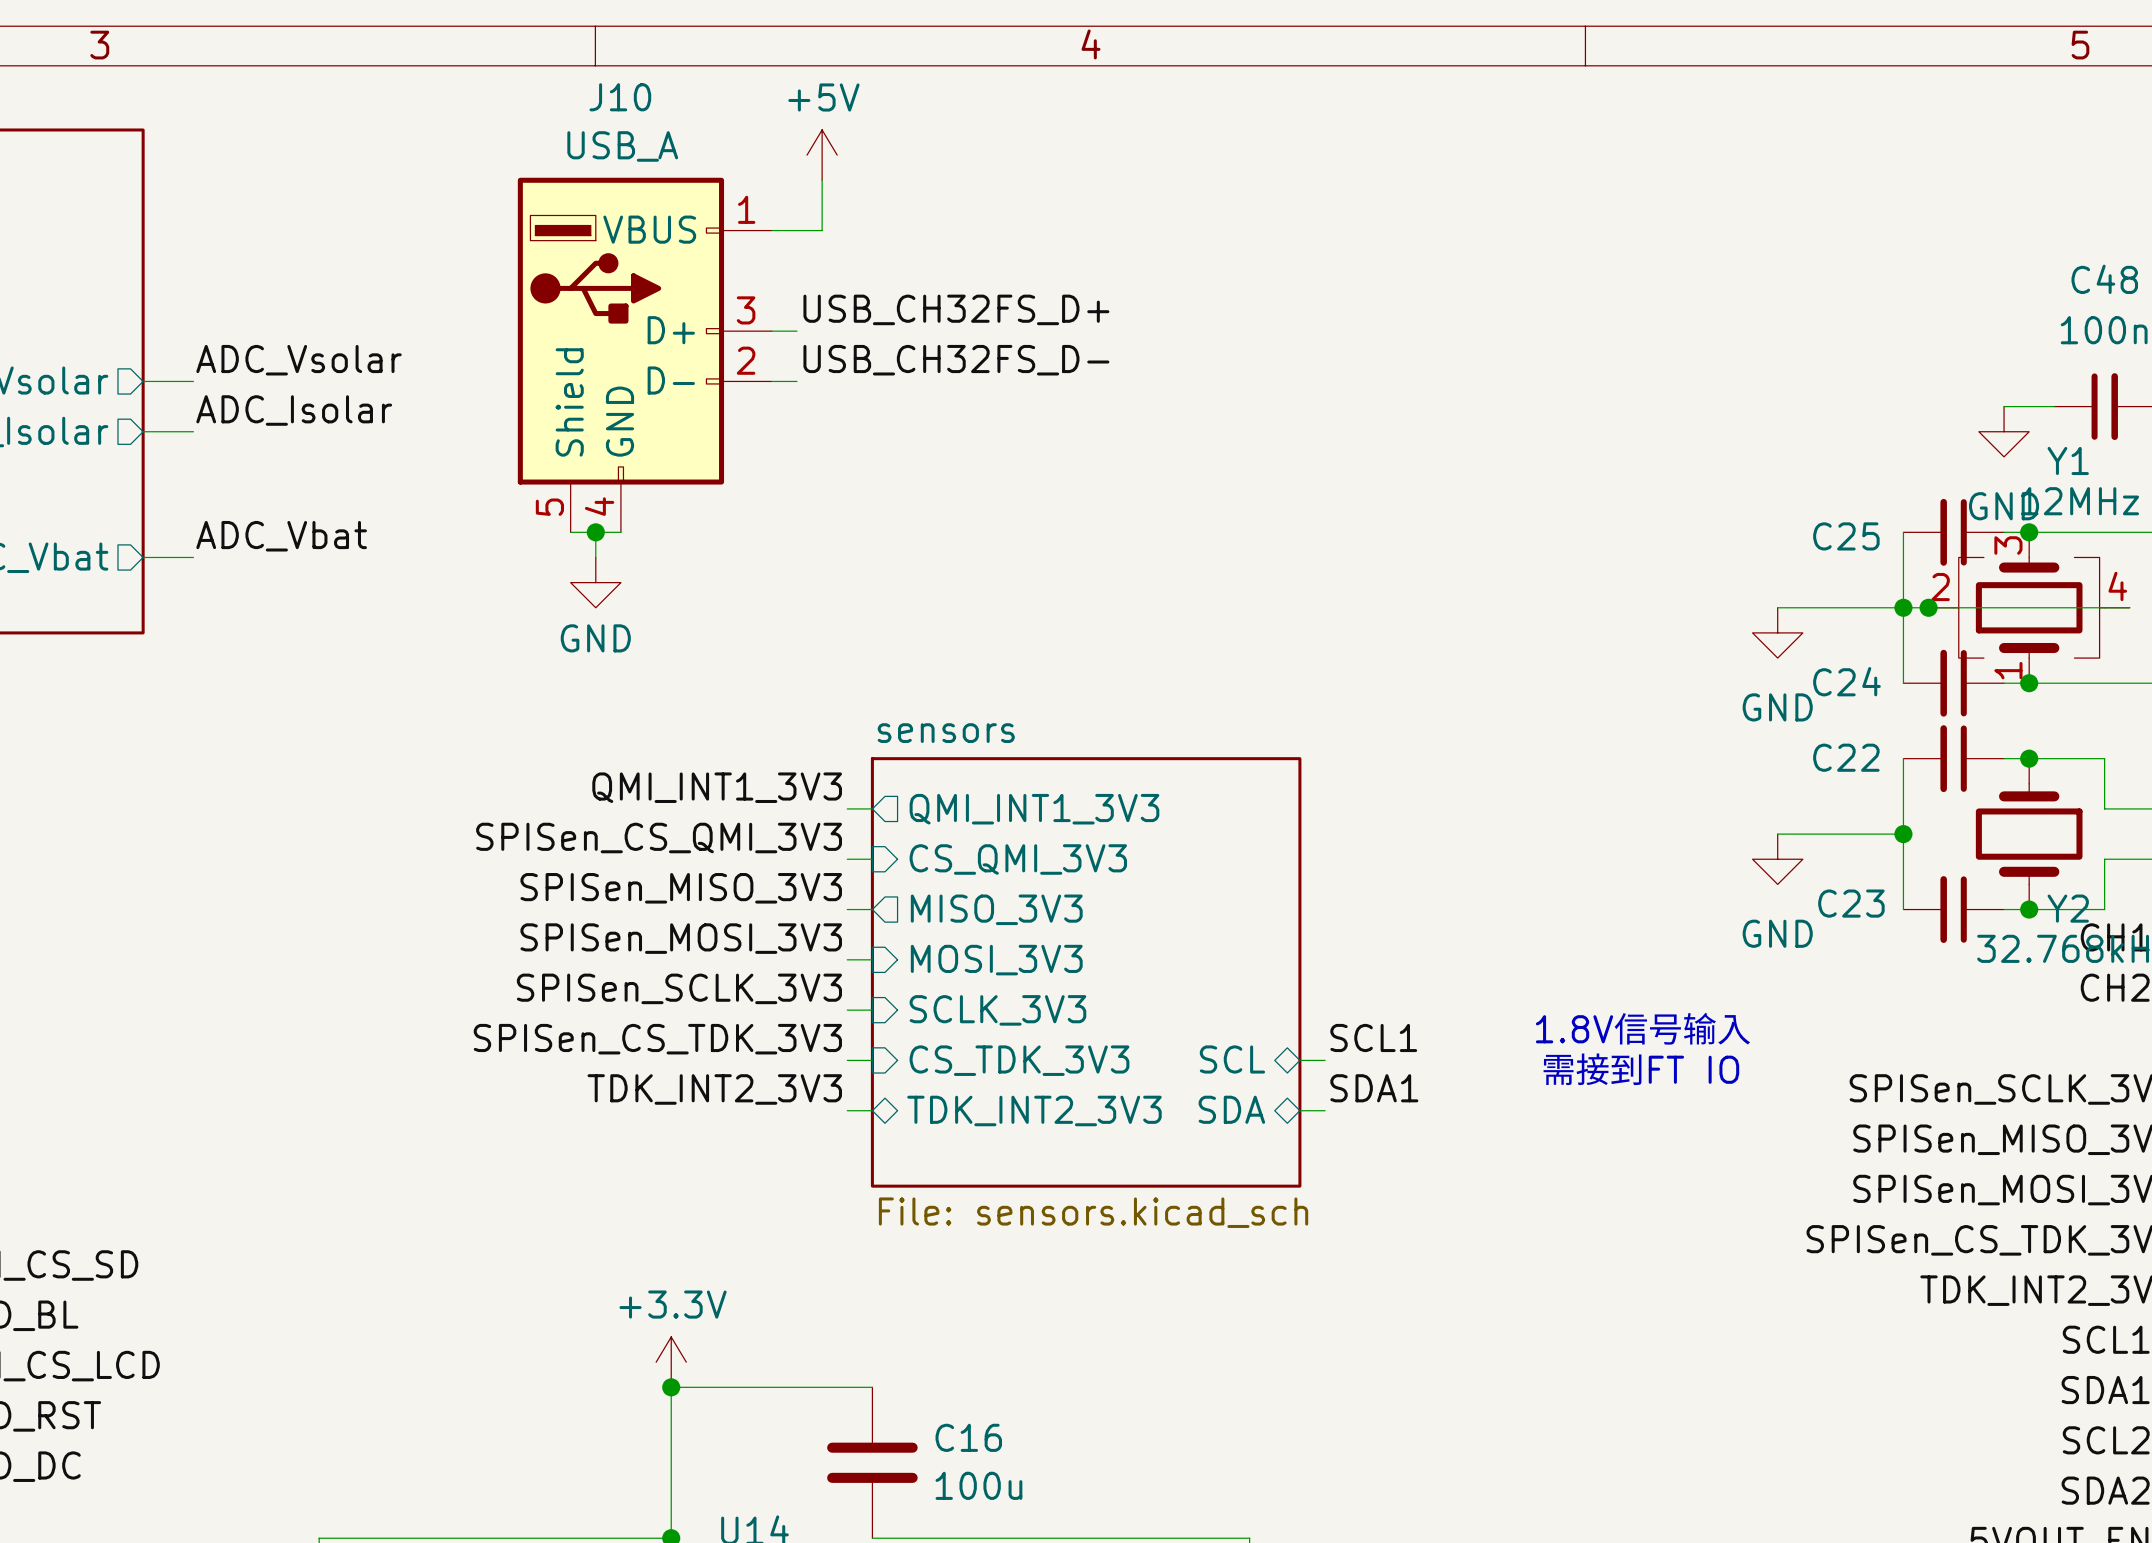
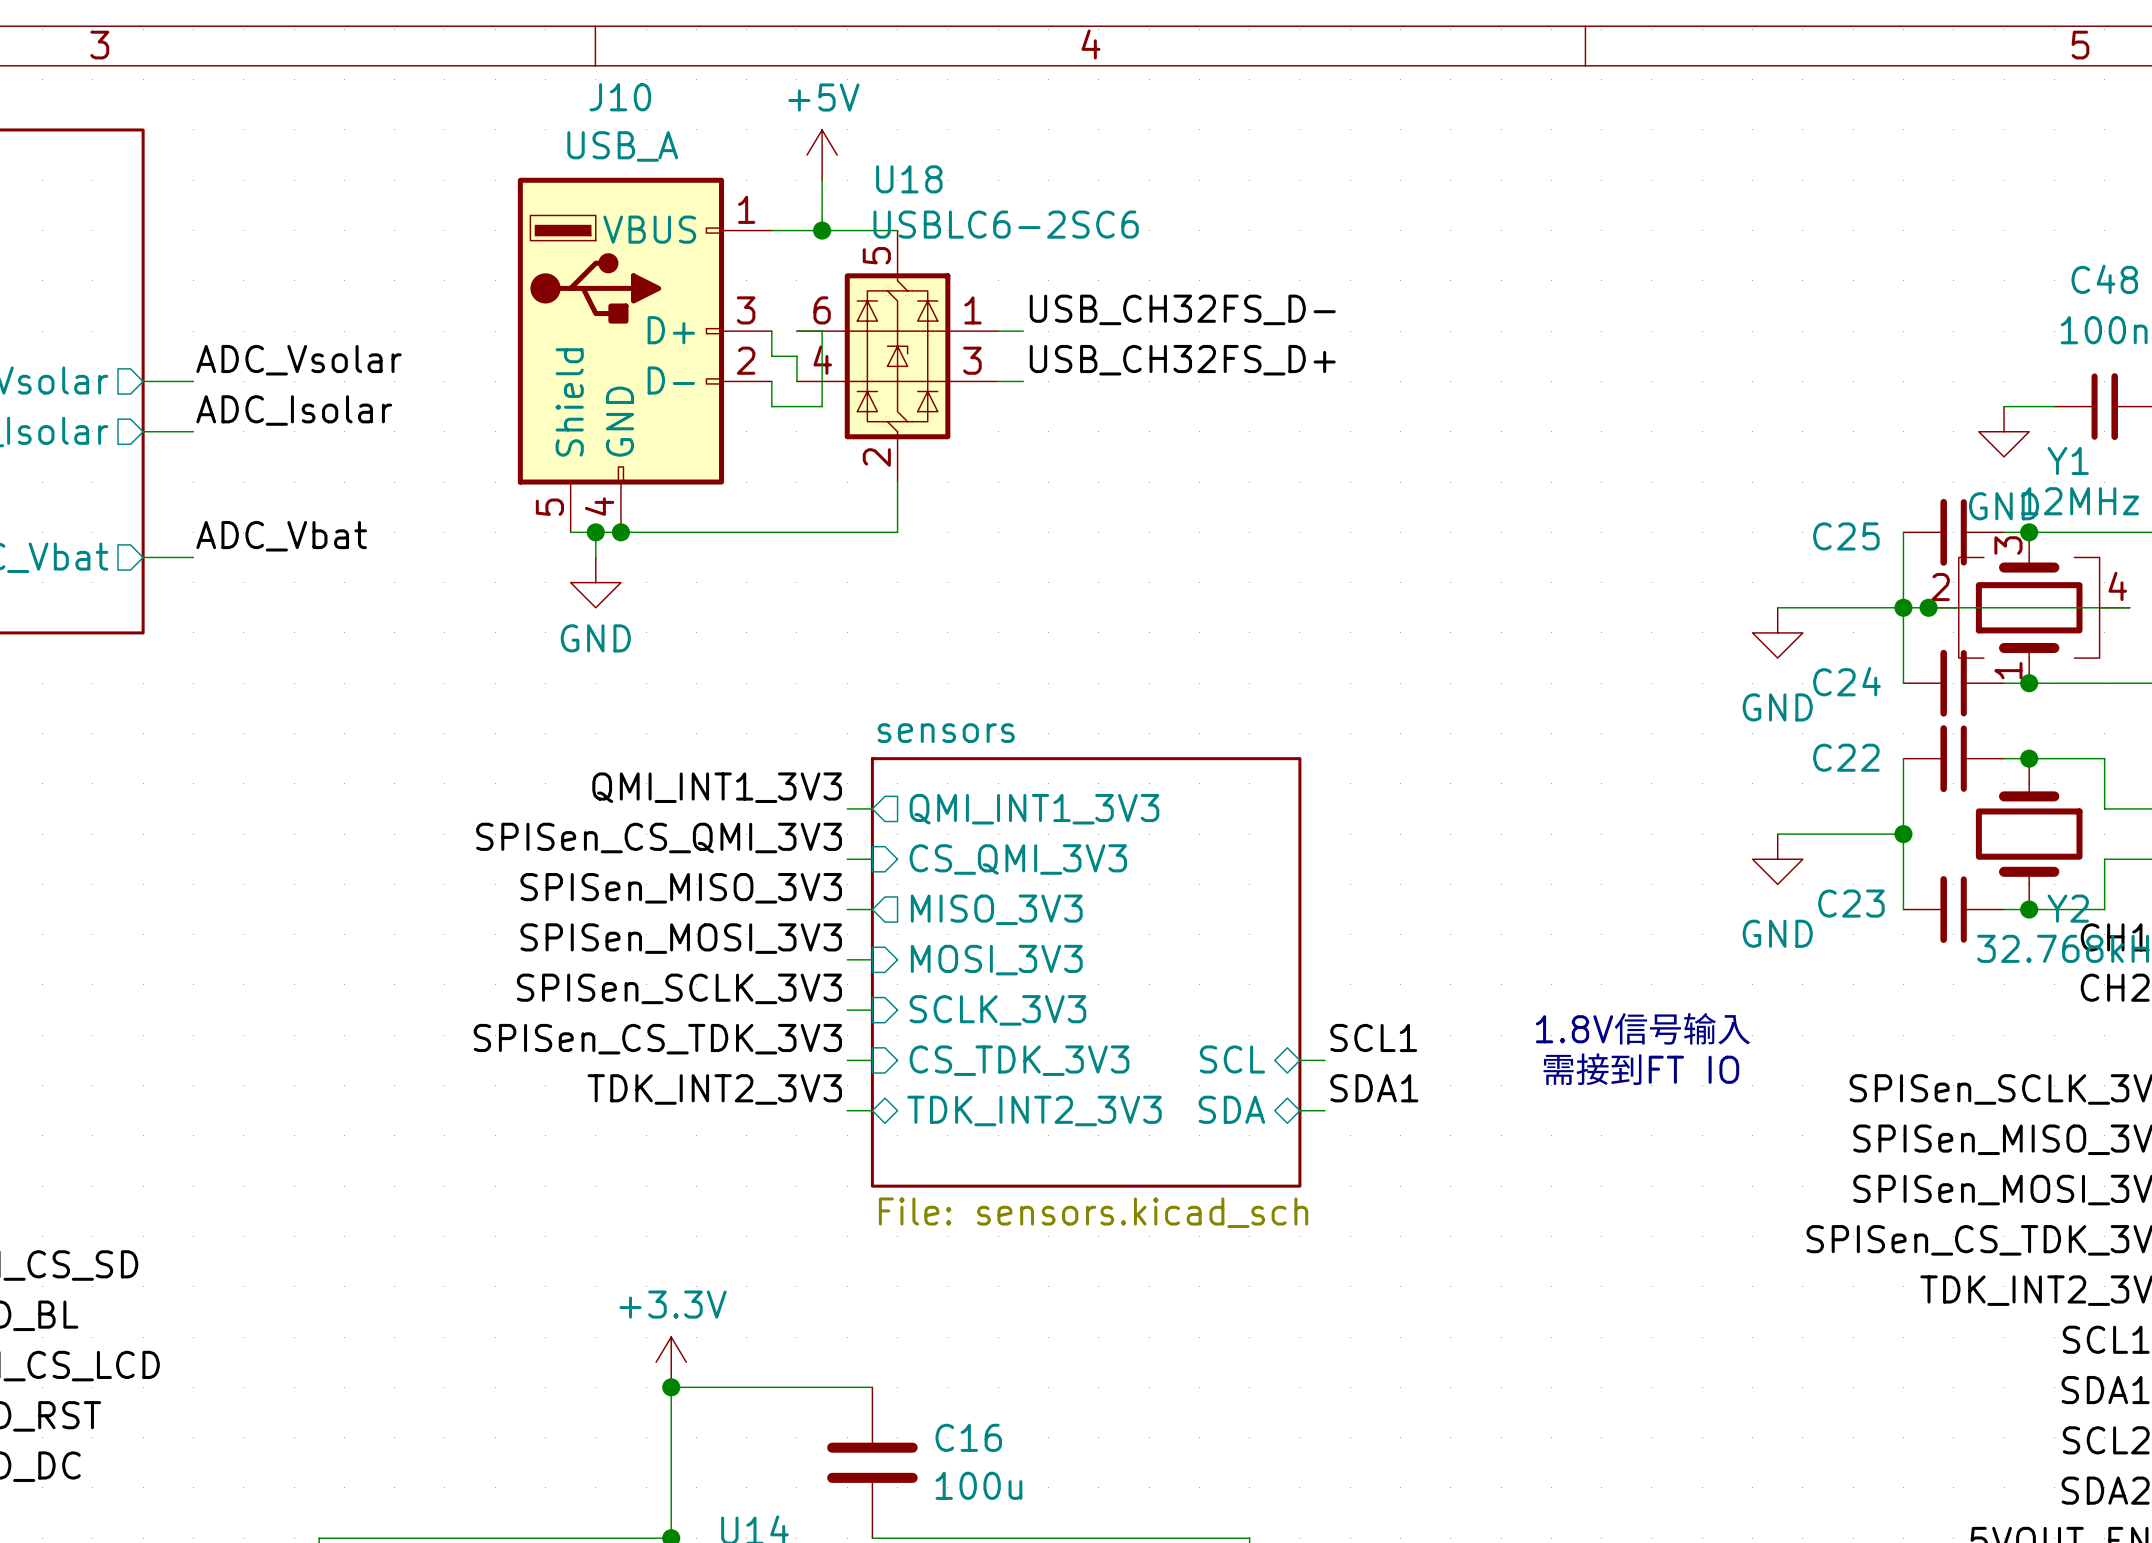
wire: none -> (822, 230) (897, 230)
junction: none -> (822, 230)
label position: USB_CH32FS_D+ (956, 309) -> USB_CH32FS_D+ (1182, 360)
wire: (771, 331) (796, 331) -> (771, 331) (771, 356) (796, 356) (796, 381)
wire: none -> (998, 331) (1023, 331)
U18: none -> USBLC6-2SC6 (897, 356)
label position: USB_CH32FS_D- (956, 360) -> USB_CH32FS_D- (1182, 309)
wire: (771, 381) (796, 381) -> (771, 381) (771, 406) (822, 406) (822, 331) (796, 331)
wire: none -> (998, 381) (1023, 381)
wire: none -> (897, 482) (897, 532) (620, 532)
junction: none -> (620, 532)

